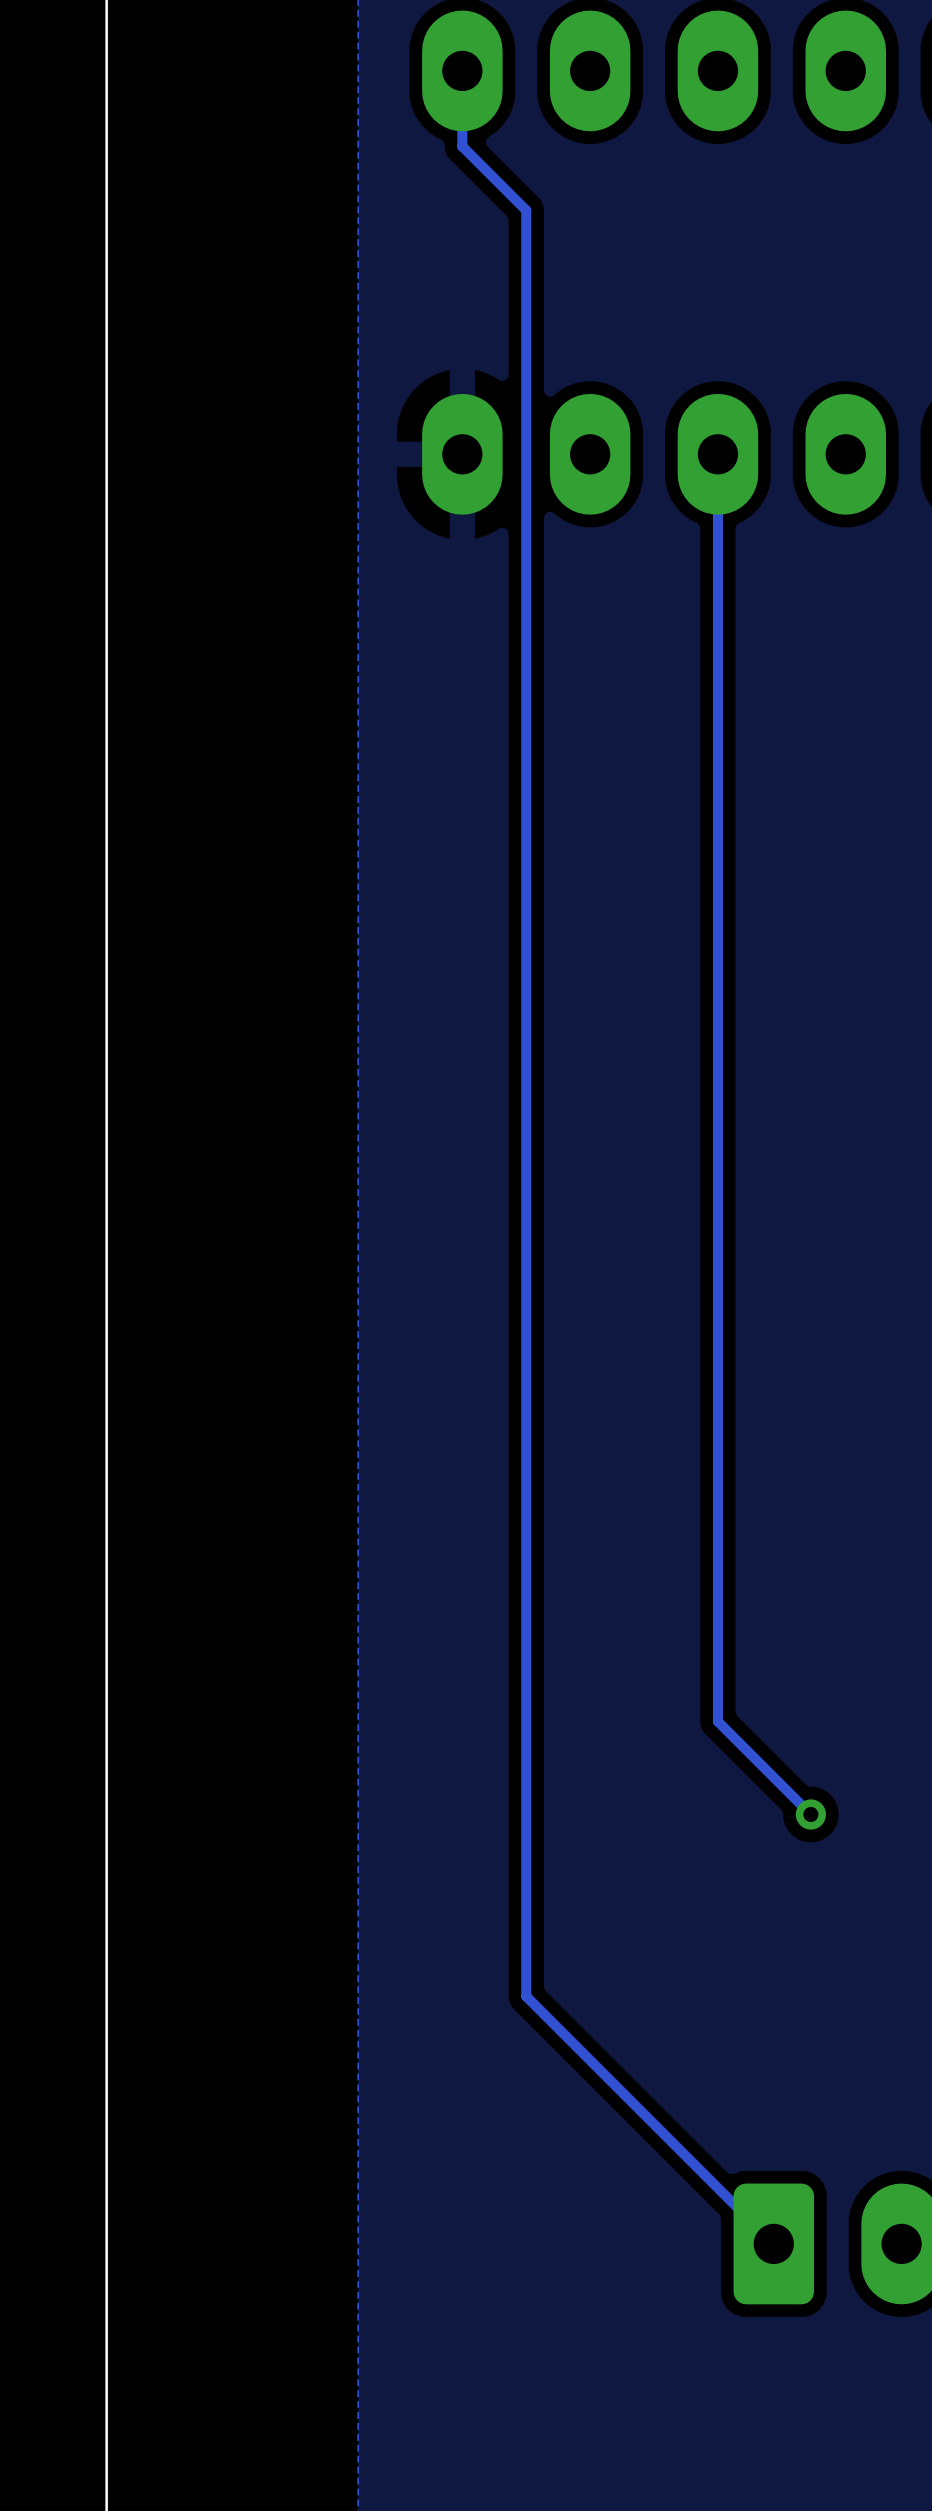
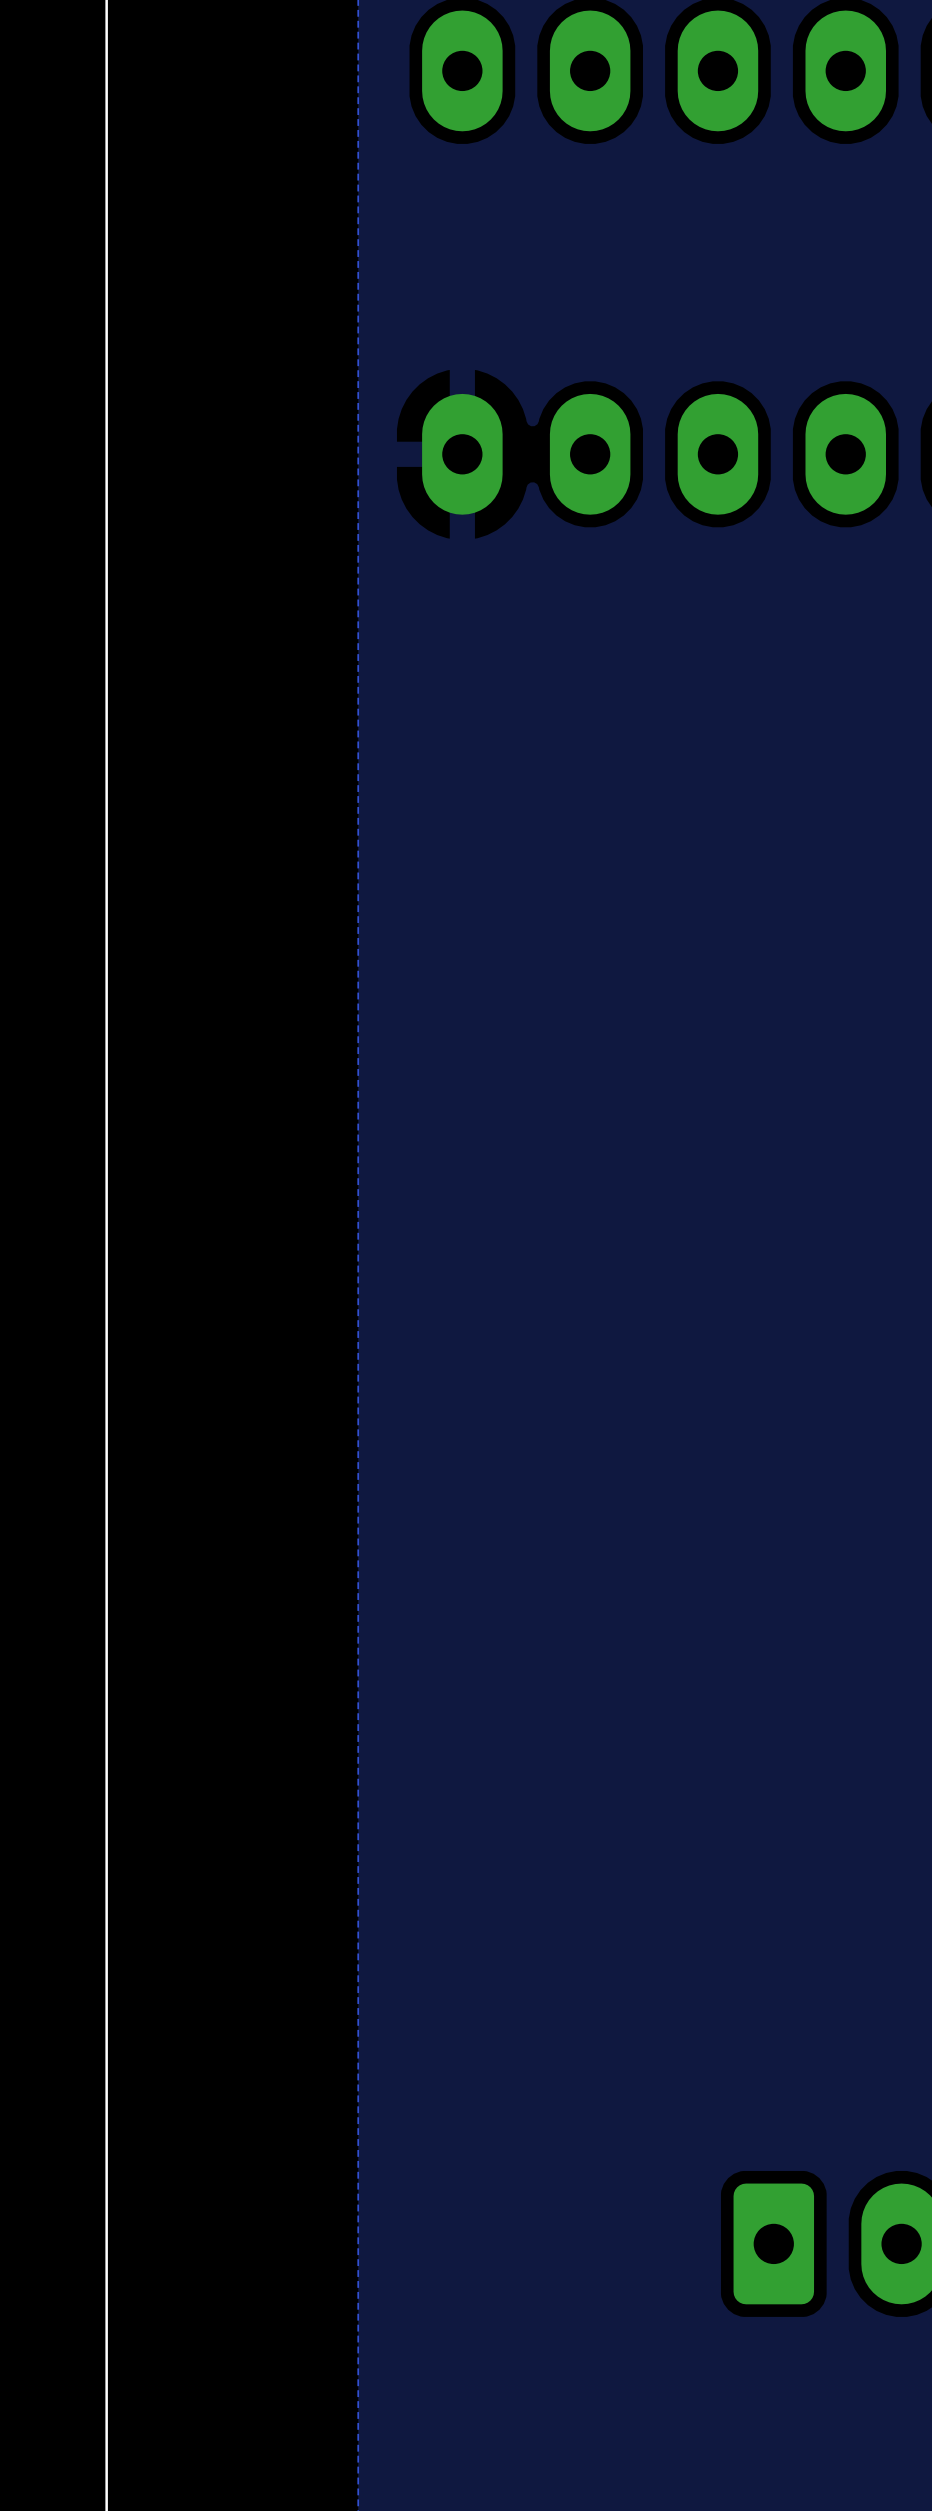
track: (462, 70) (462, 146) (526, 210) (526, 1996) (773, 2243) -> none
track: (717, 454) (717, 1721) (810, 1814) -> none
via: (810, 1814) -> none

